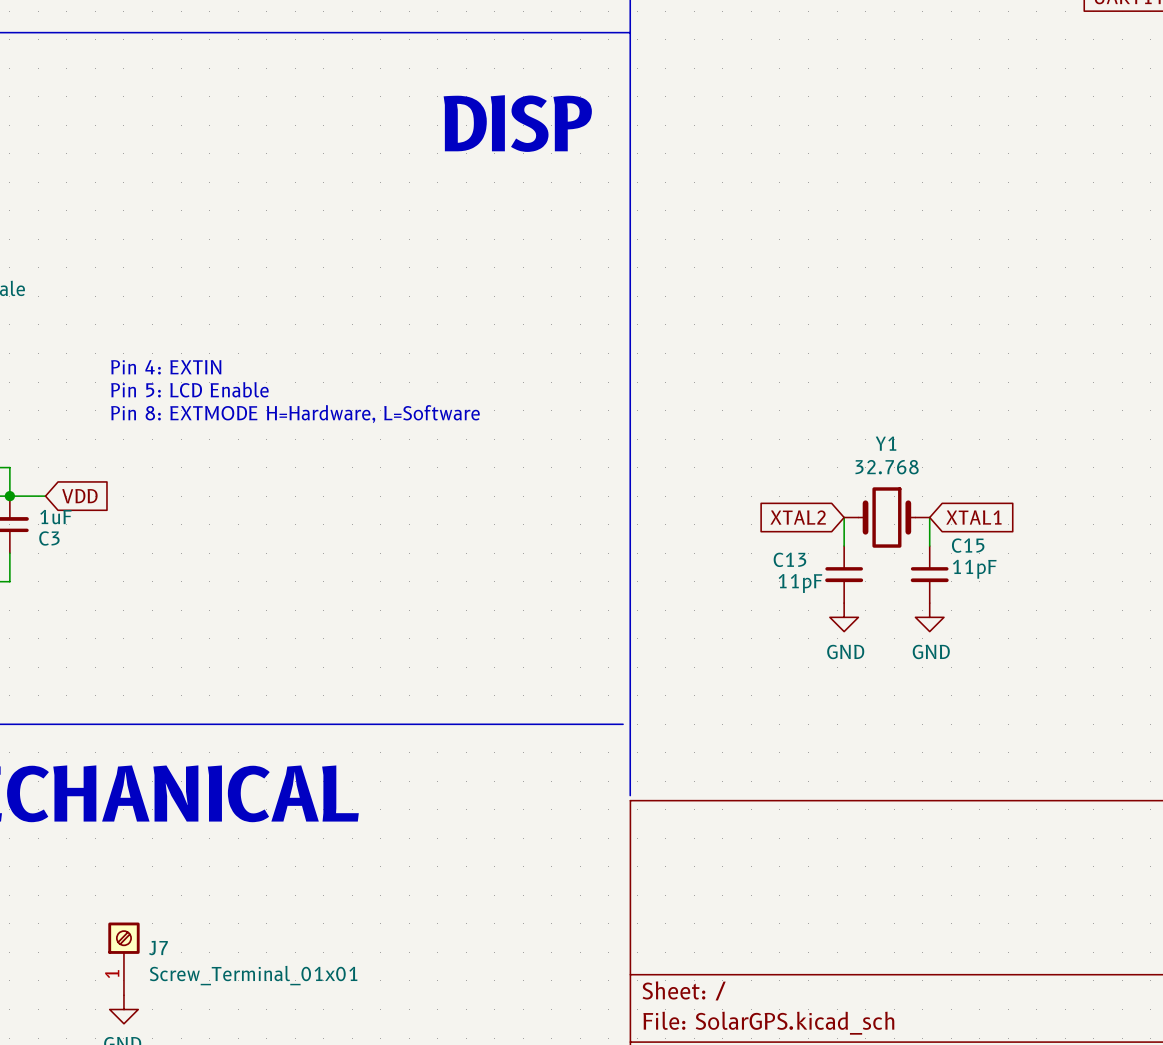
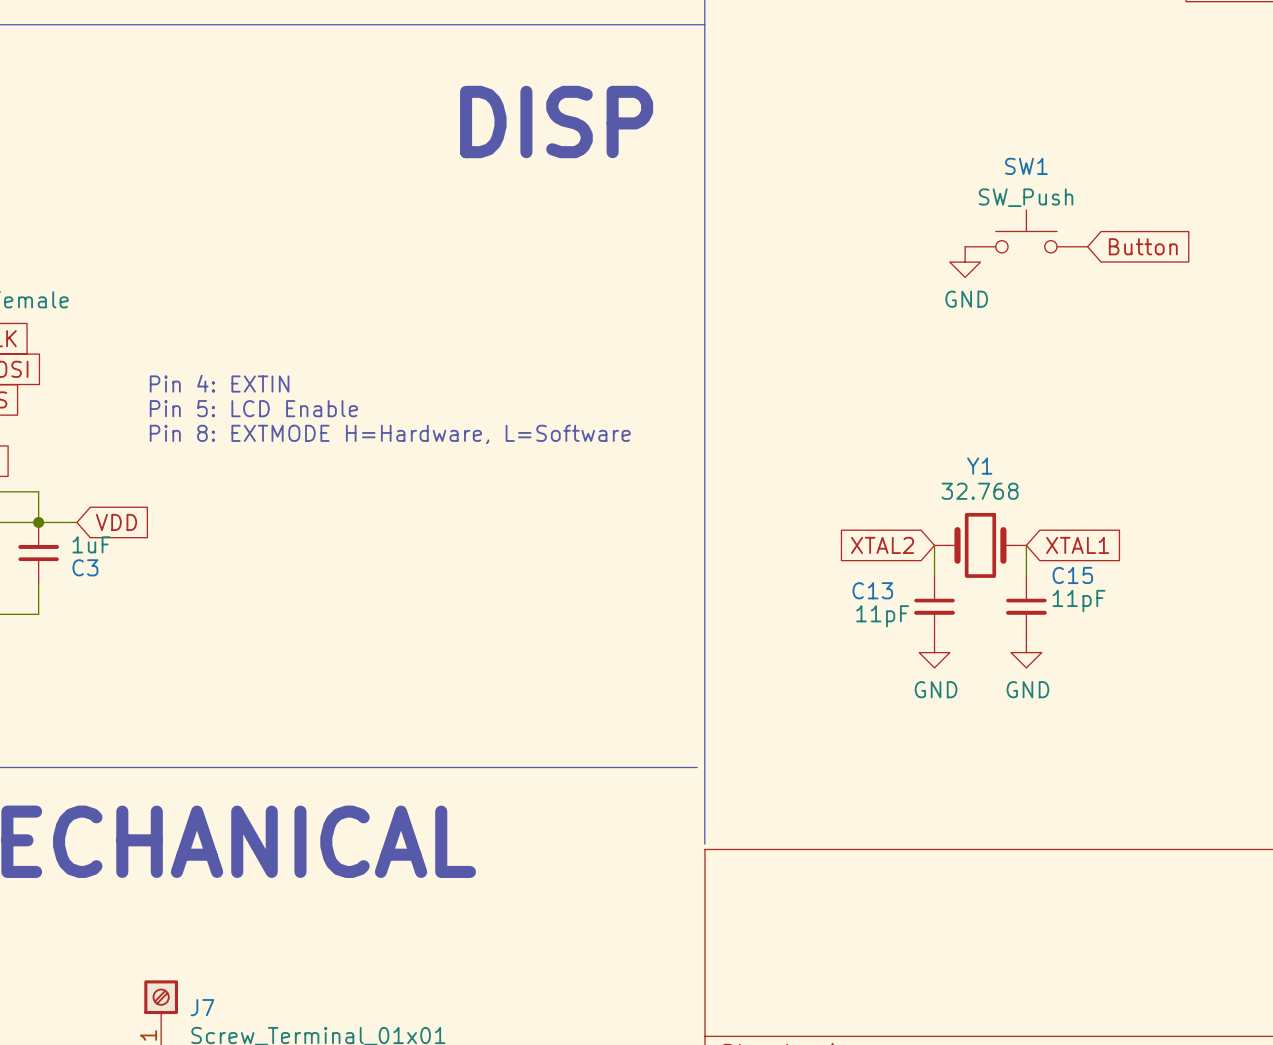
SW1: none -> SW_Push (1026, 231)
global label: none -> Button (1143, 246)
power symbol: none -> GND (965, 262)

